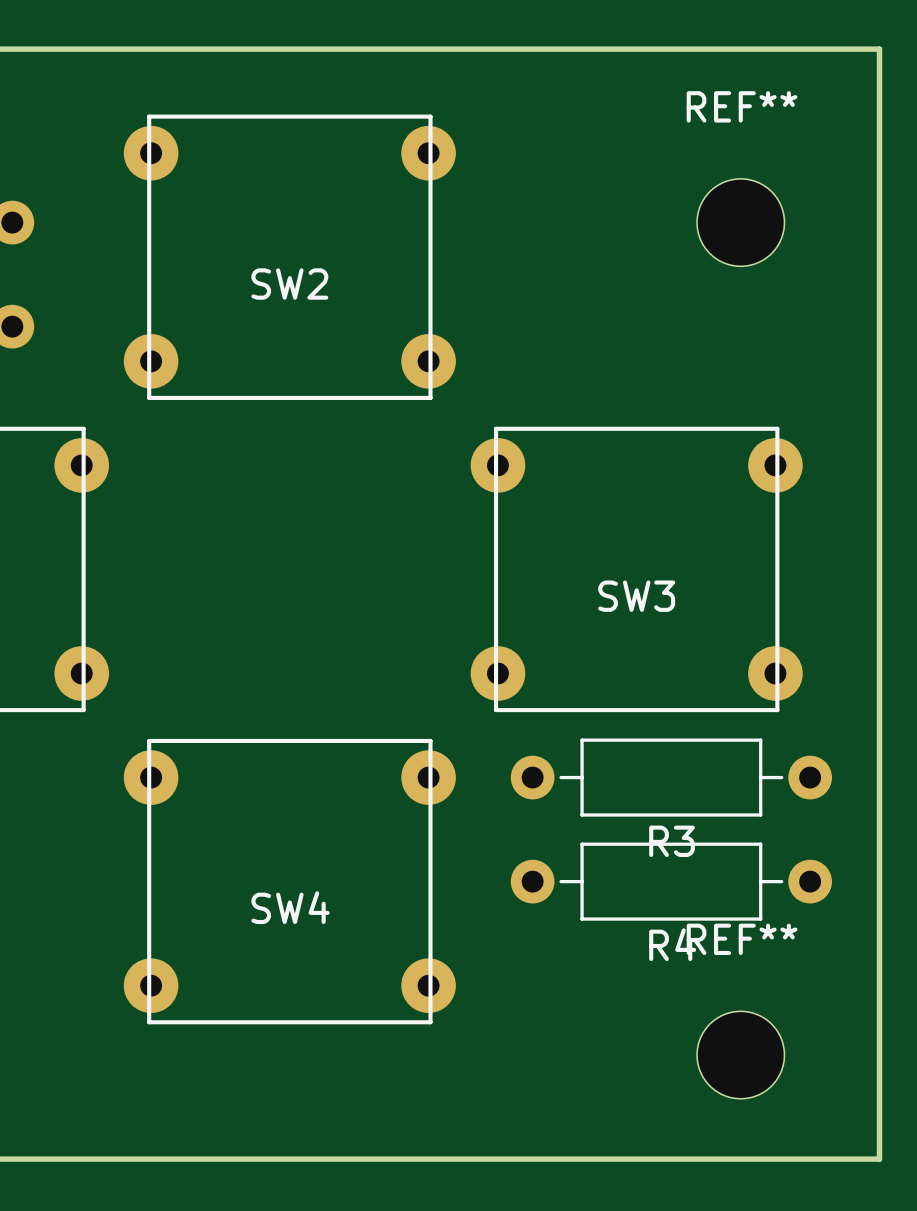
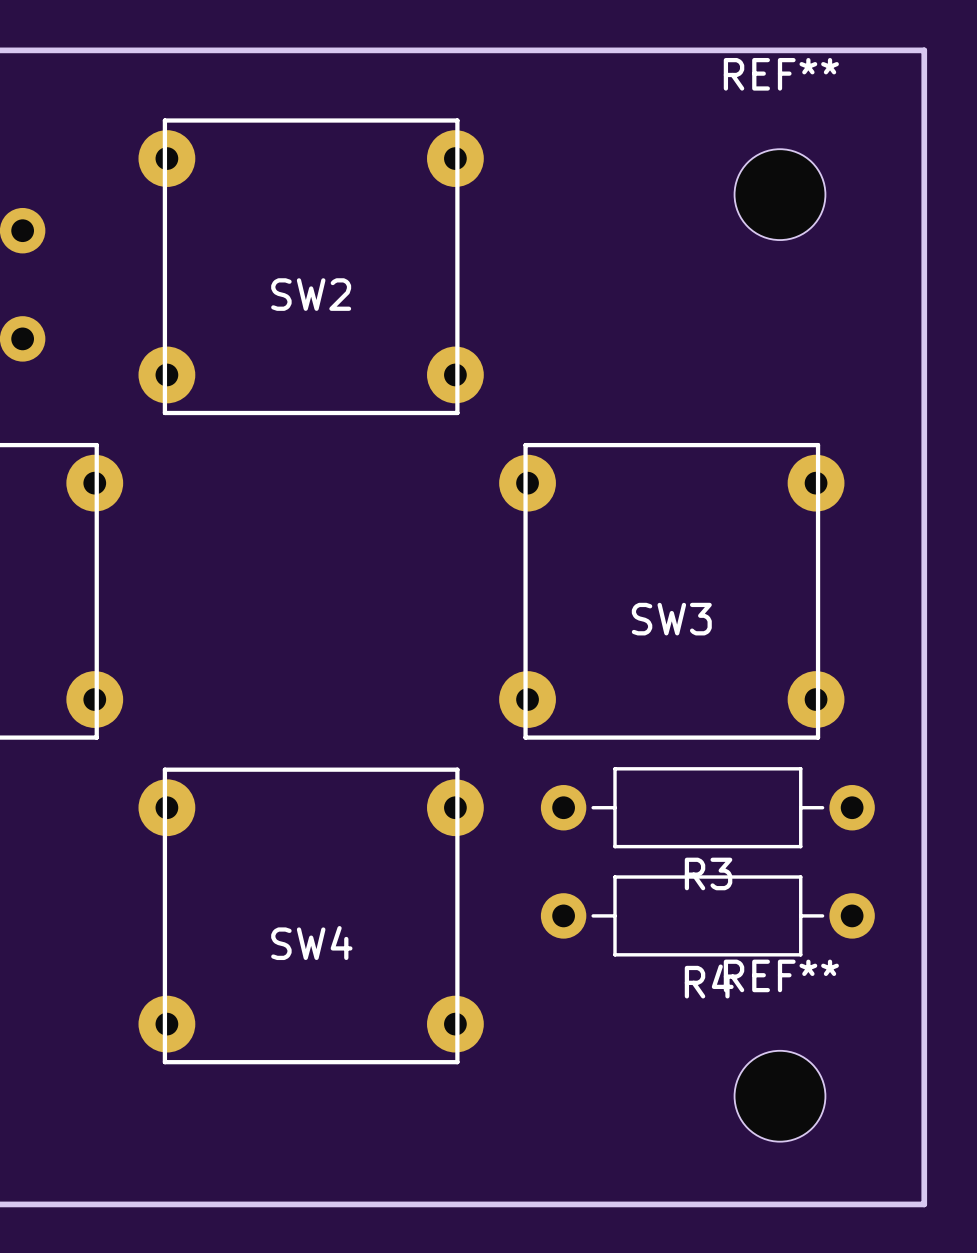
REF** position: (740, 222) -> (779, 194)

